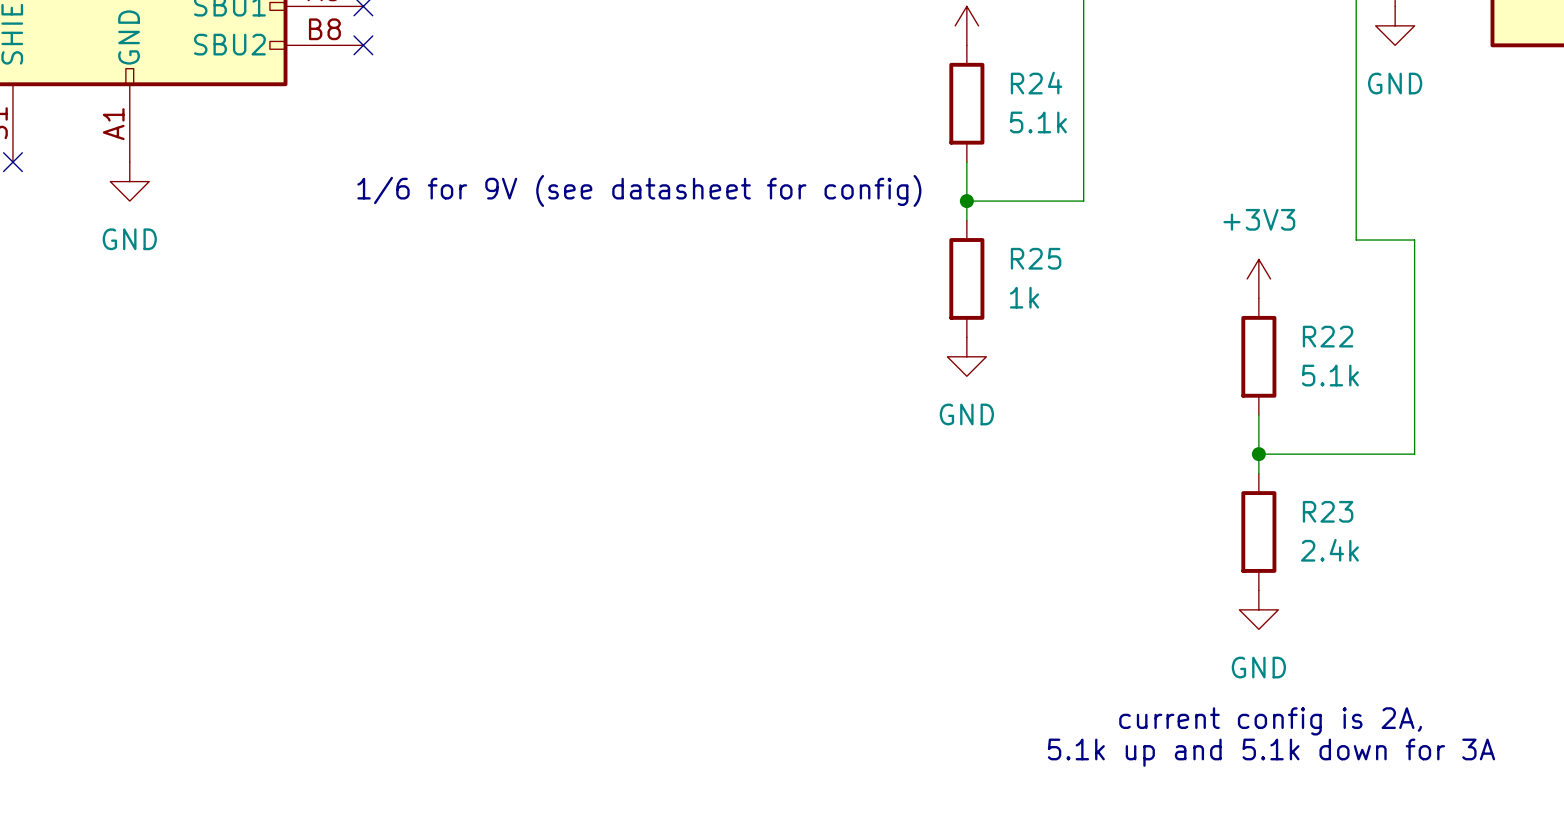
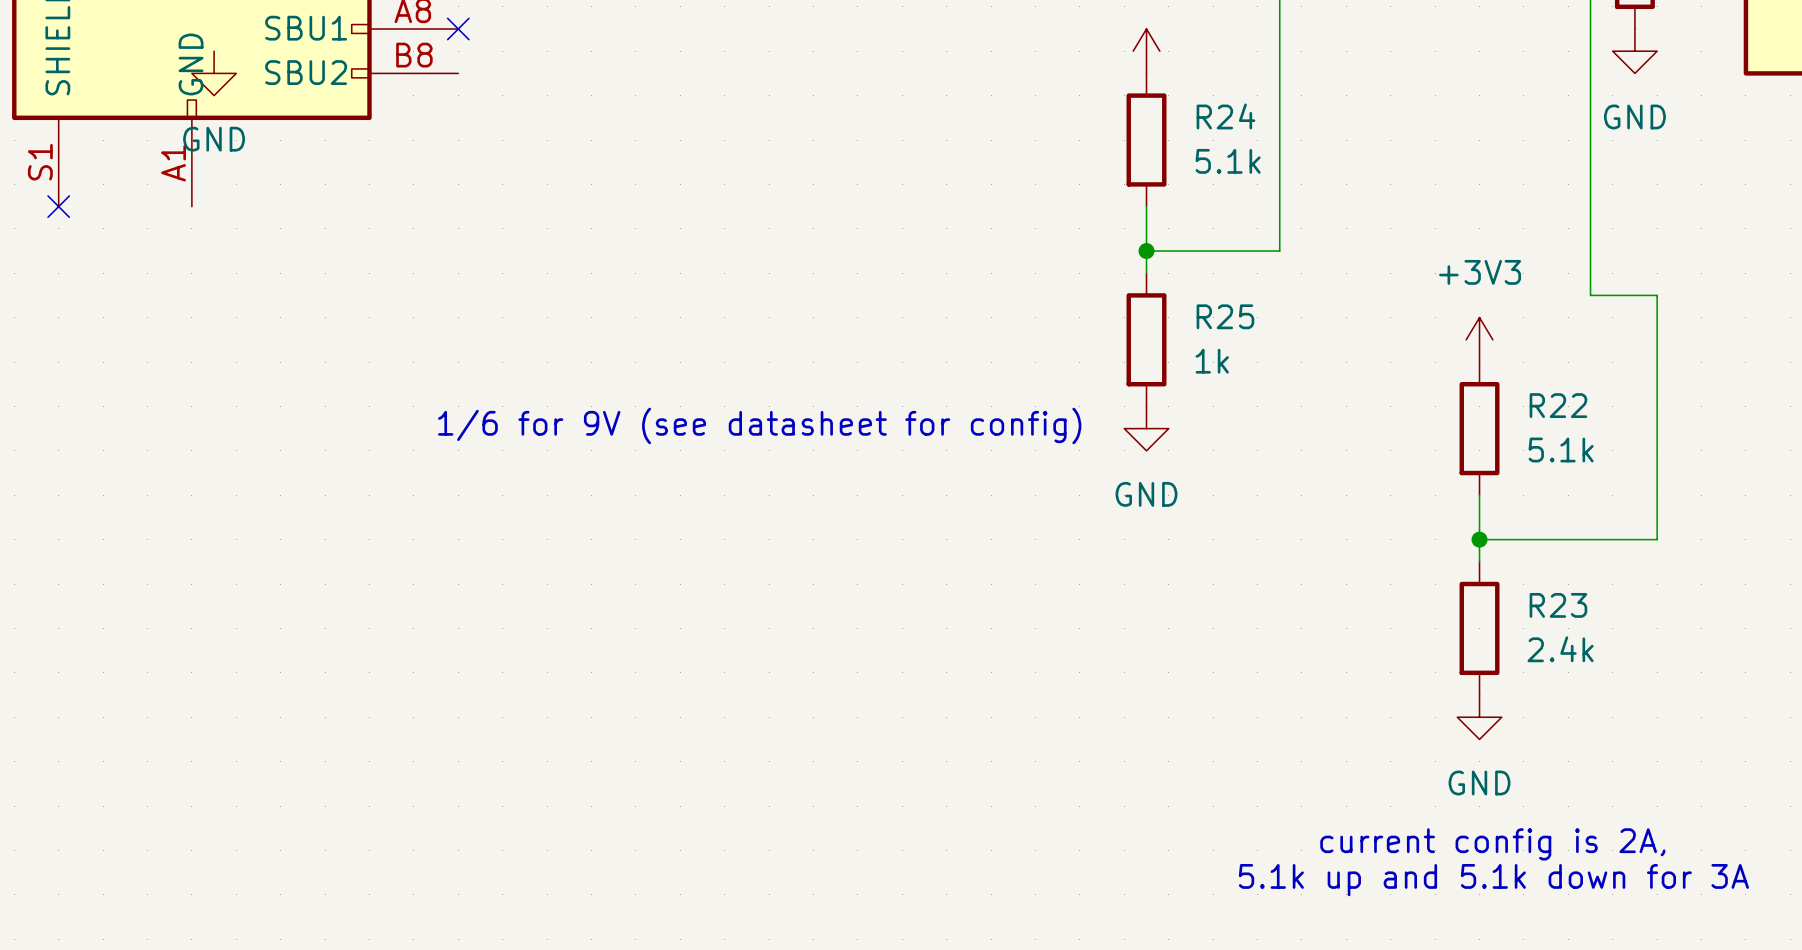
no-connect mark: (363, 45) -> none
power symbol position: GND (129, 181) -> GND (214, 73)
text position: 1/6 for 9V (see datasheet for config) (639, 190) -> 1/6 for 9V (see datasheet for config) (759, 425)

